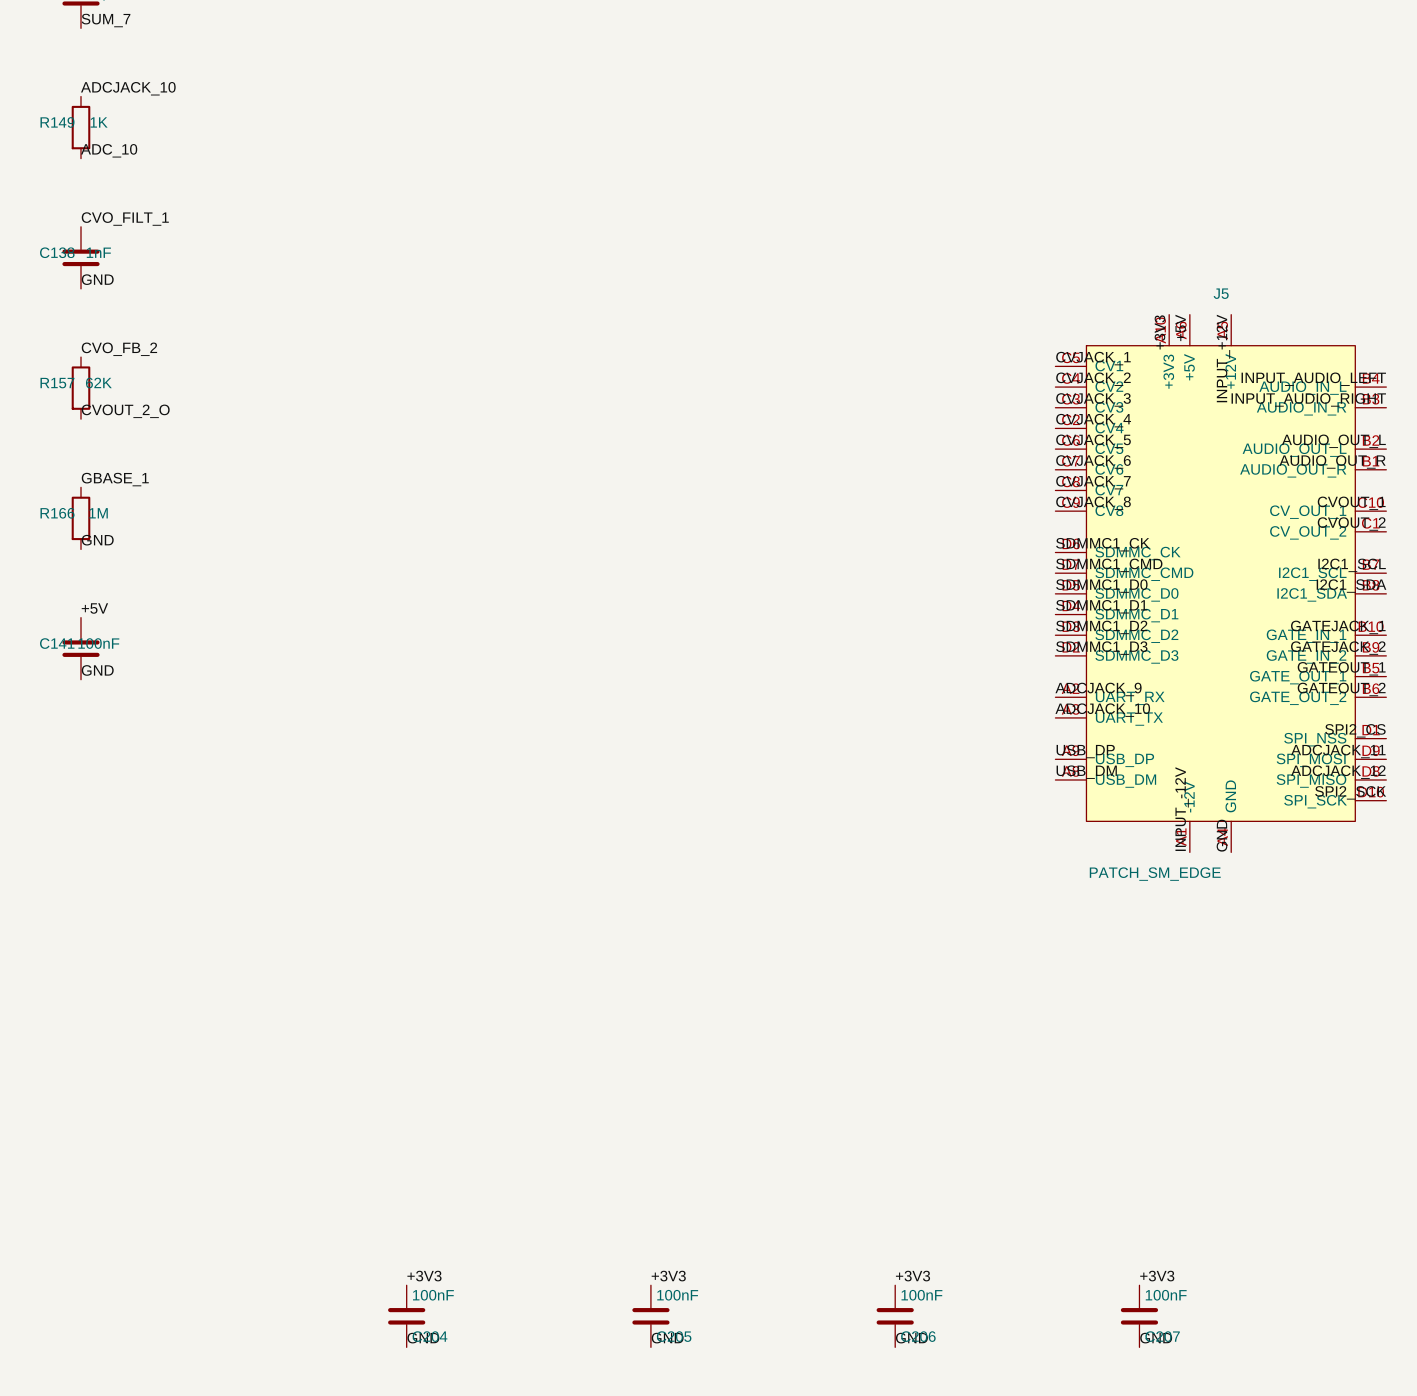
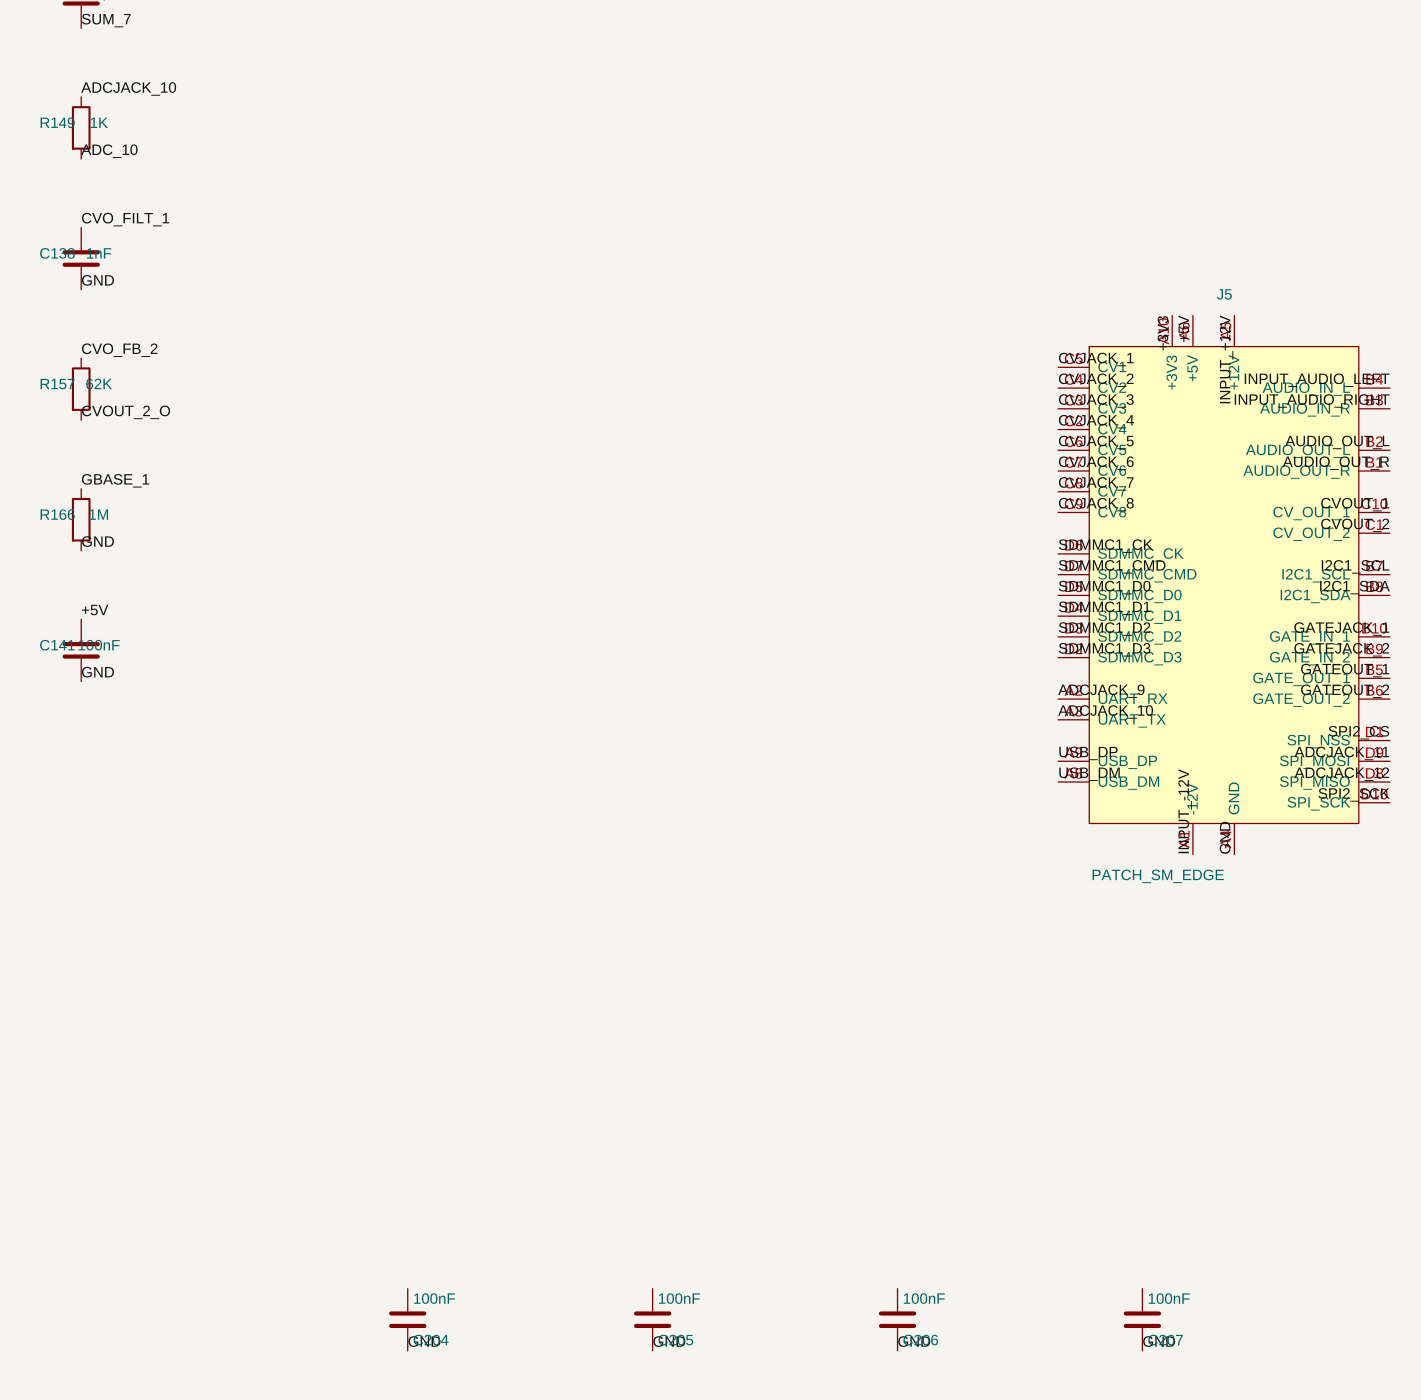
label: +3V3 (424, 1276) -> none
label: +3V3 (668, 1276) -> none
label: +3V3 (913, 1276) -> none
label: +3V3 (1157, 1276) -> none

